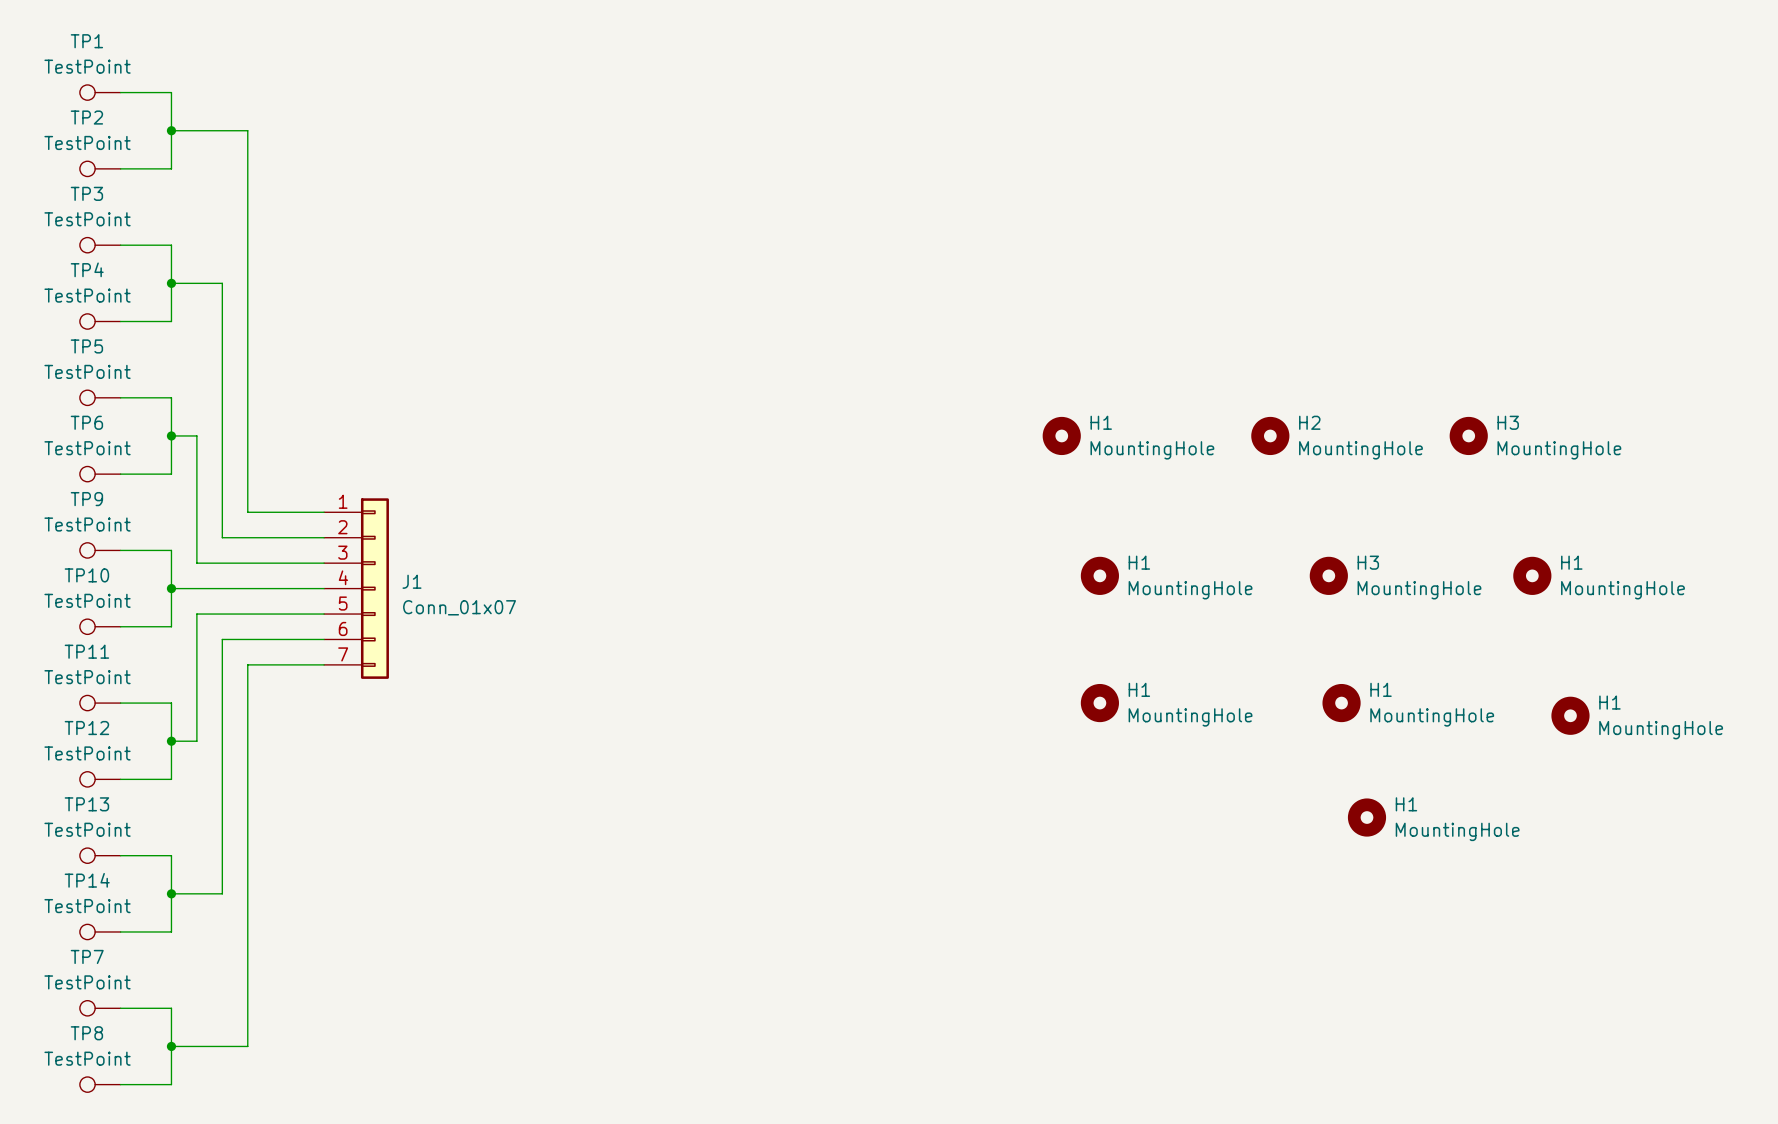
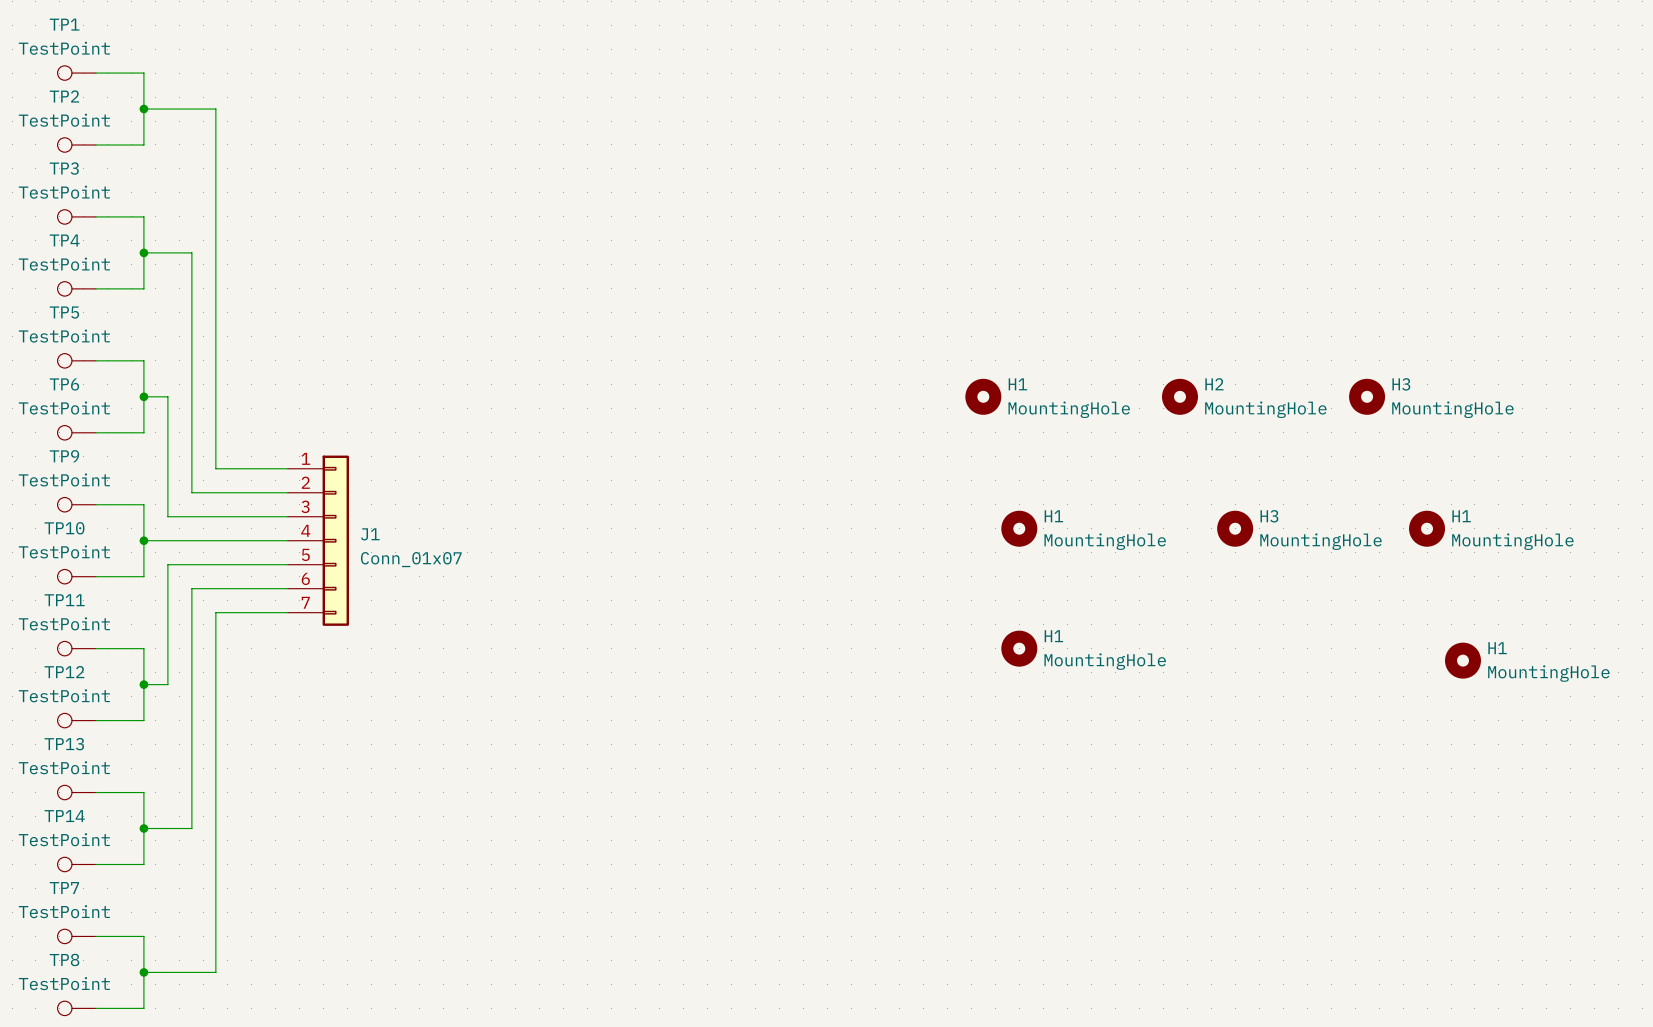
H1: MountingHole (1341, 703) -> none
H1: MountingHole (1366, 817) -> none

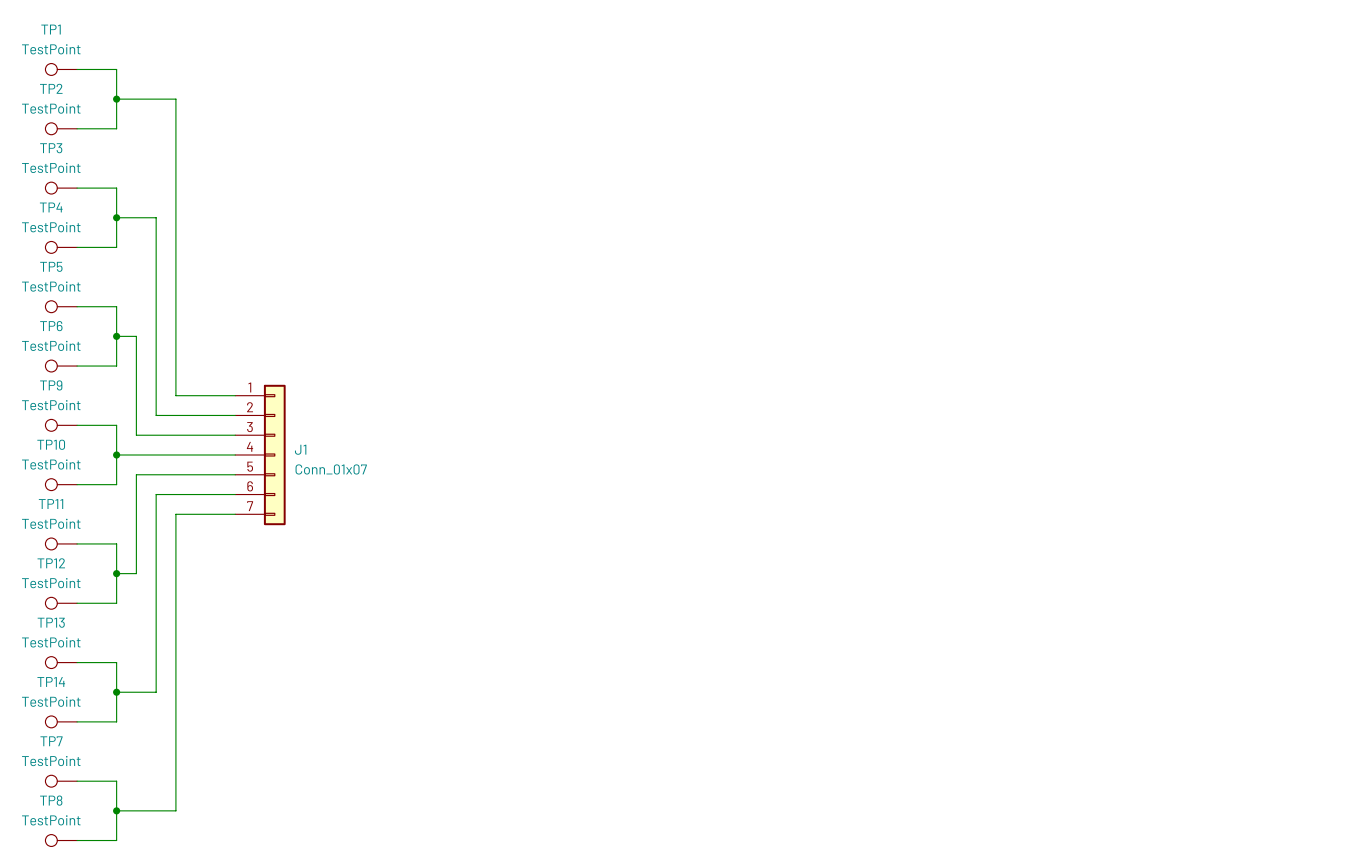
H1: MountingHole (983, 396) -> none
H2: MountingHole (1179, 396) -> none
H3: MountingHole (1367, 396) -> none
H1: MountingHole (1019, 528) -> none
H3: MountingHole (1235, 528) -> none
H1: MountingHole (1427, 528) -> none
H1: MountingHole (1019, 648) -> none
H1: MountingHole (1462, 660) -> none

